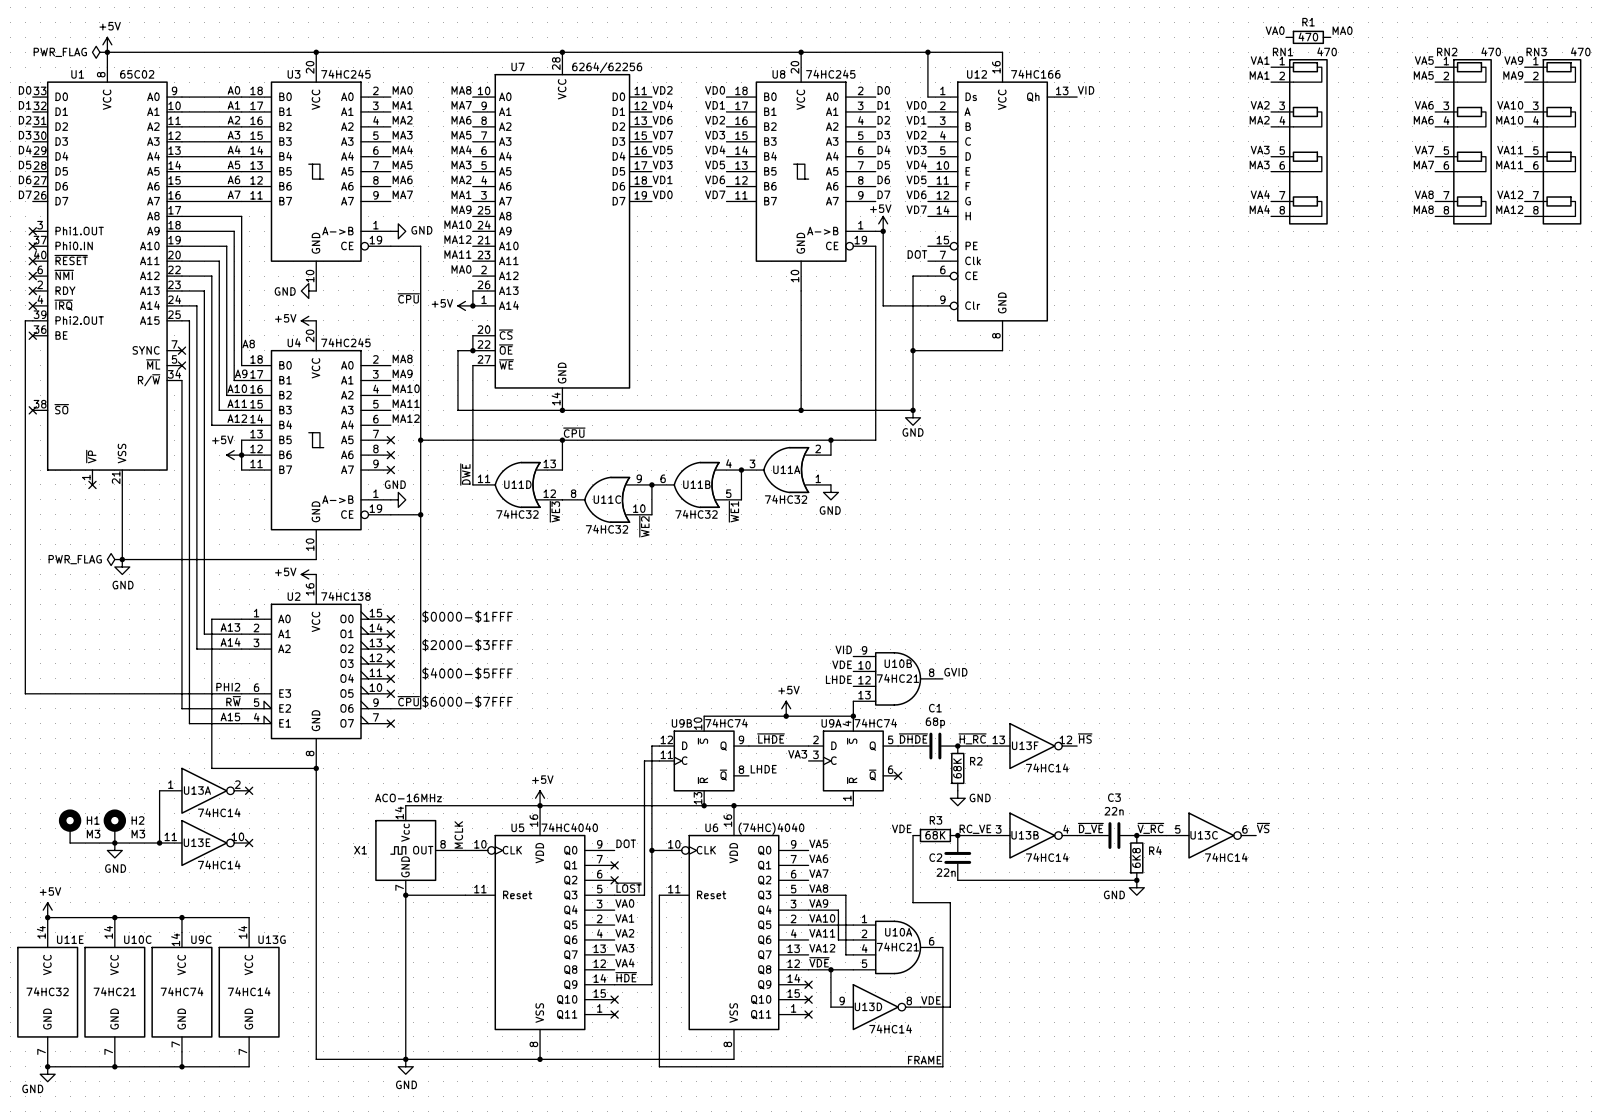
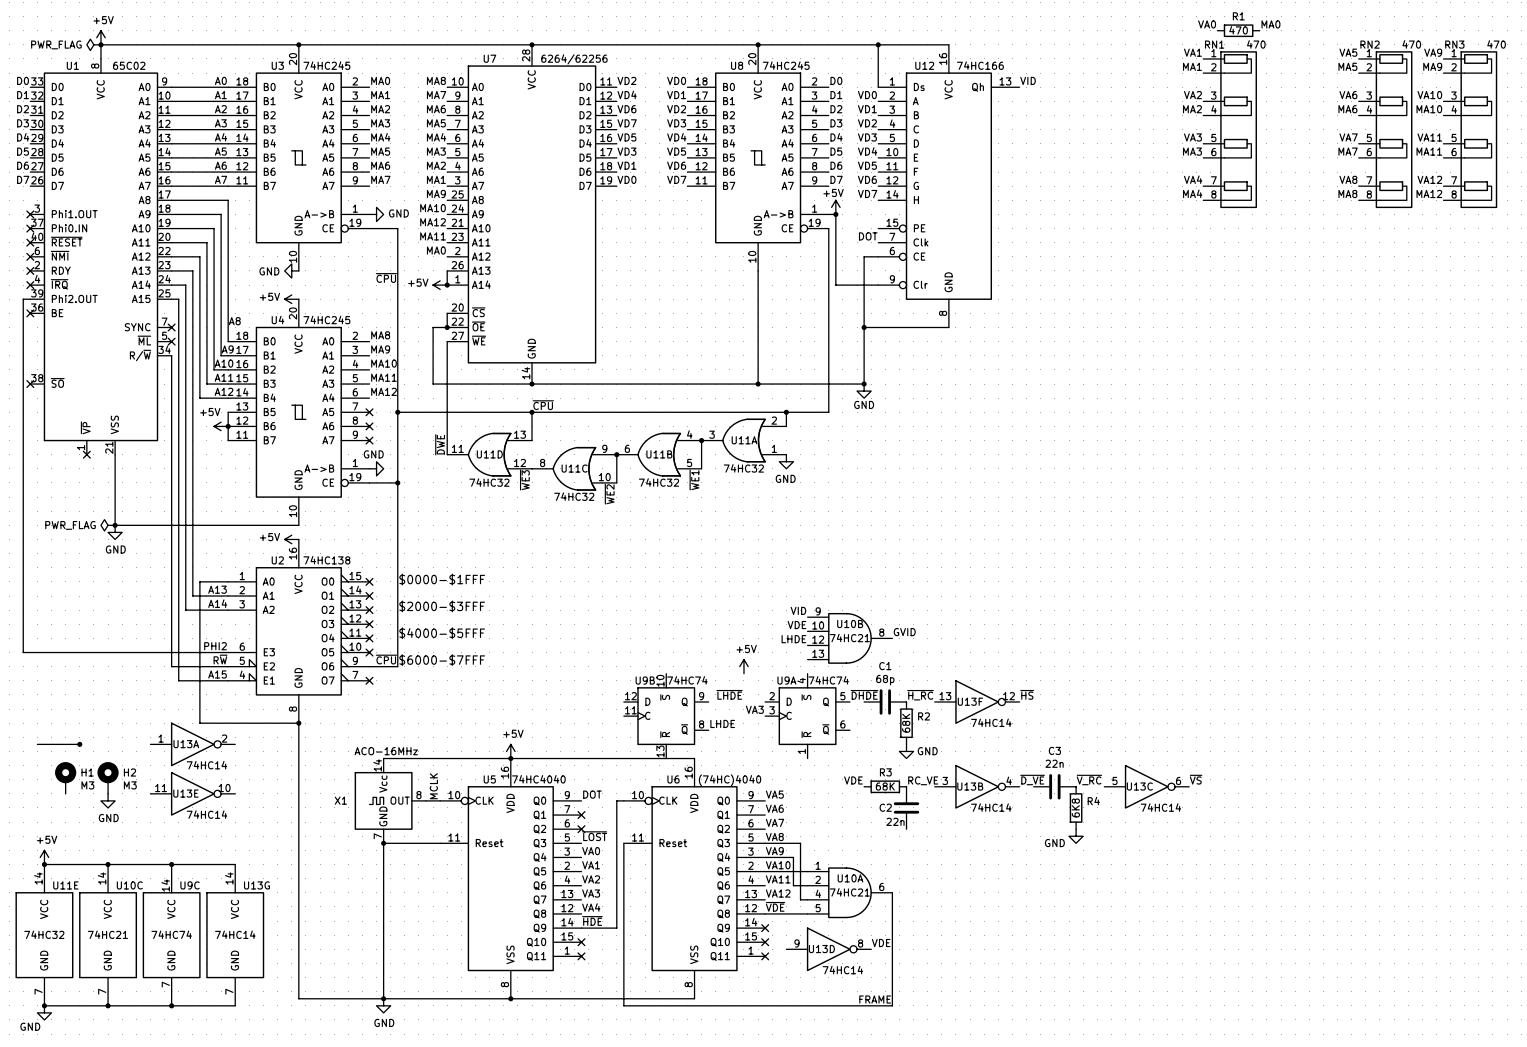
wire: (853, 701) (853, 716) (704, 716) -> none
junction: (786, 716) -> none
junction: (853, 716) -> none
wire: (659, 746) (651, 746) (651, 850) -> none
wire: (748, 746) (808, 746) -> none
wire: (898, 746) (913, 746) -> none
wire: (957, 746) (987, 746) -> none
junction: (957, 746) -> none
wire: (659, 760) (644, 760) (644, 895) (614, 895) -> none
no-connect mark: (898, 775) -> none
wire: none -> (37, 744) (79, 744)
junction: none -> (79, 744)
wire: (159, 790) (159, 843) (70, 843) -> none
no-connect mark: (249, 790) -> none
junction: (704, 805) -> none
wire: (733, 805) (853, 805) -> none
junction: (733, 805) -> none
wire: (913, 835) (913, 902) (950, 902) (950, 1007) (920, 1007) -> none
wire: (957, 835) (987, 835) -> none
junction: (957, 835) -> none
wire: (1077, 835) (1092, 835) -> none
wire: (1136, 835) (1166, 835) -> none
junction: (1136, 835) -> none
junction: (114, 843) -> none
junction: (159, 843) -> none
no-connect mark: (249, 843) -> none
junction: (651, 850) -> none
wire: (957, 880) (1136, 880) -> none
junction: (1136, 880) -> none
wire: (830, 969) (830, 1007) -> none
junction: (830, 969) -> none

